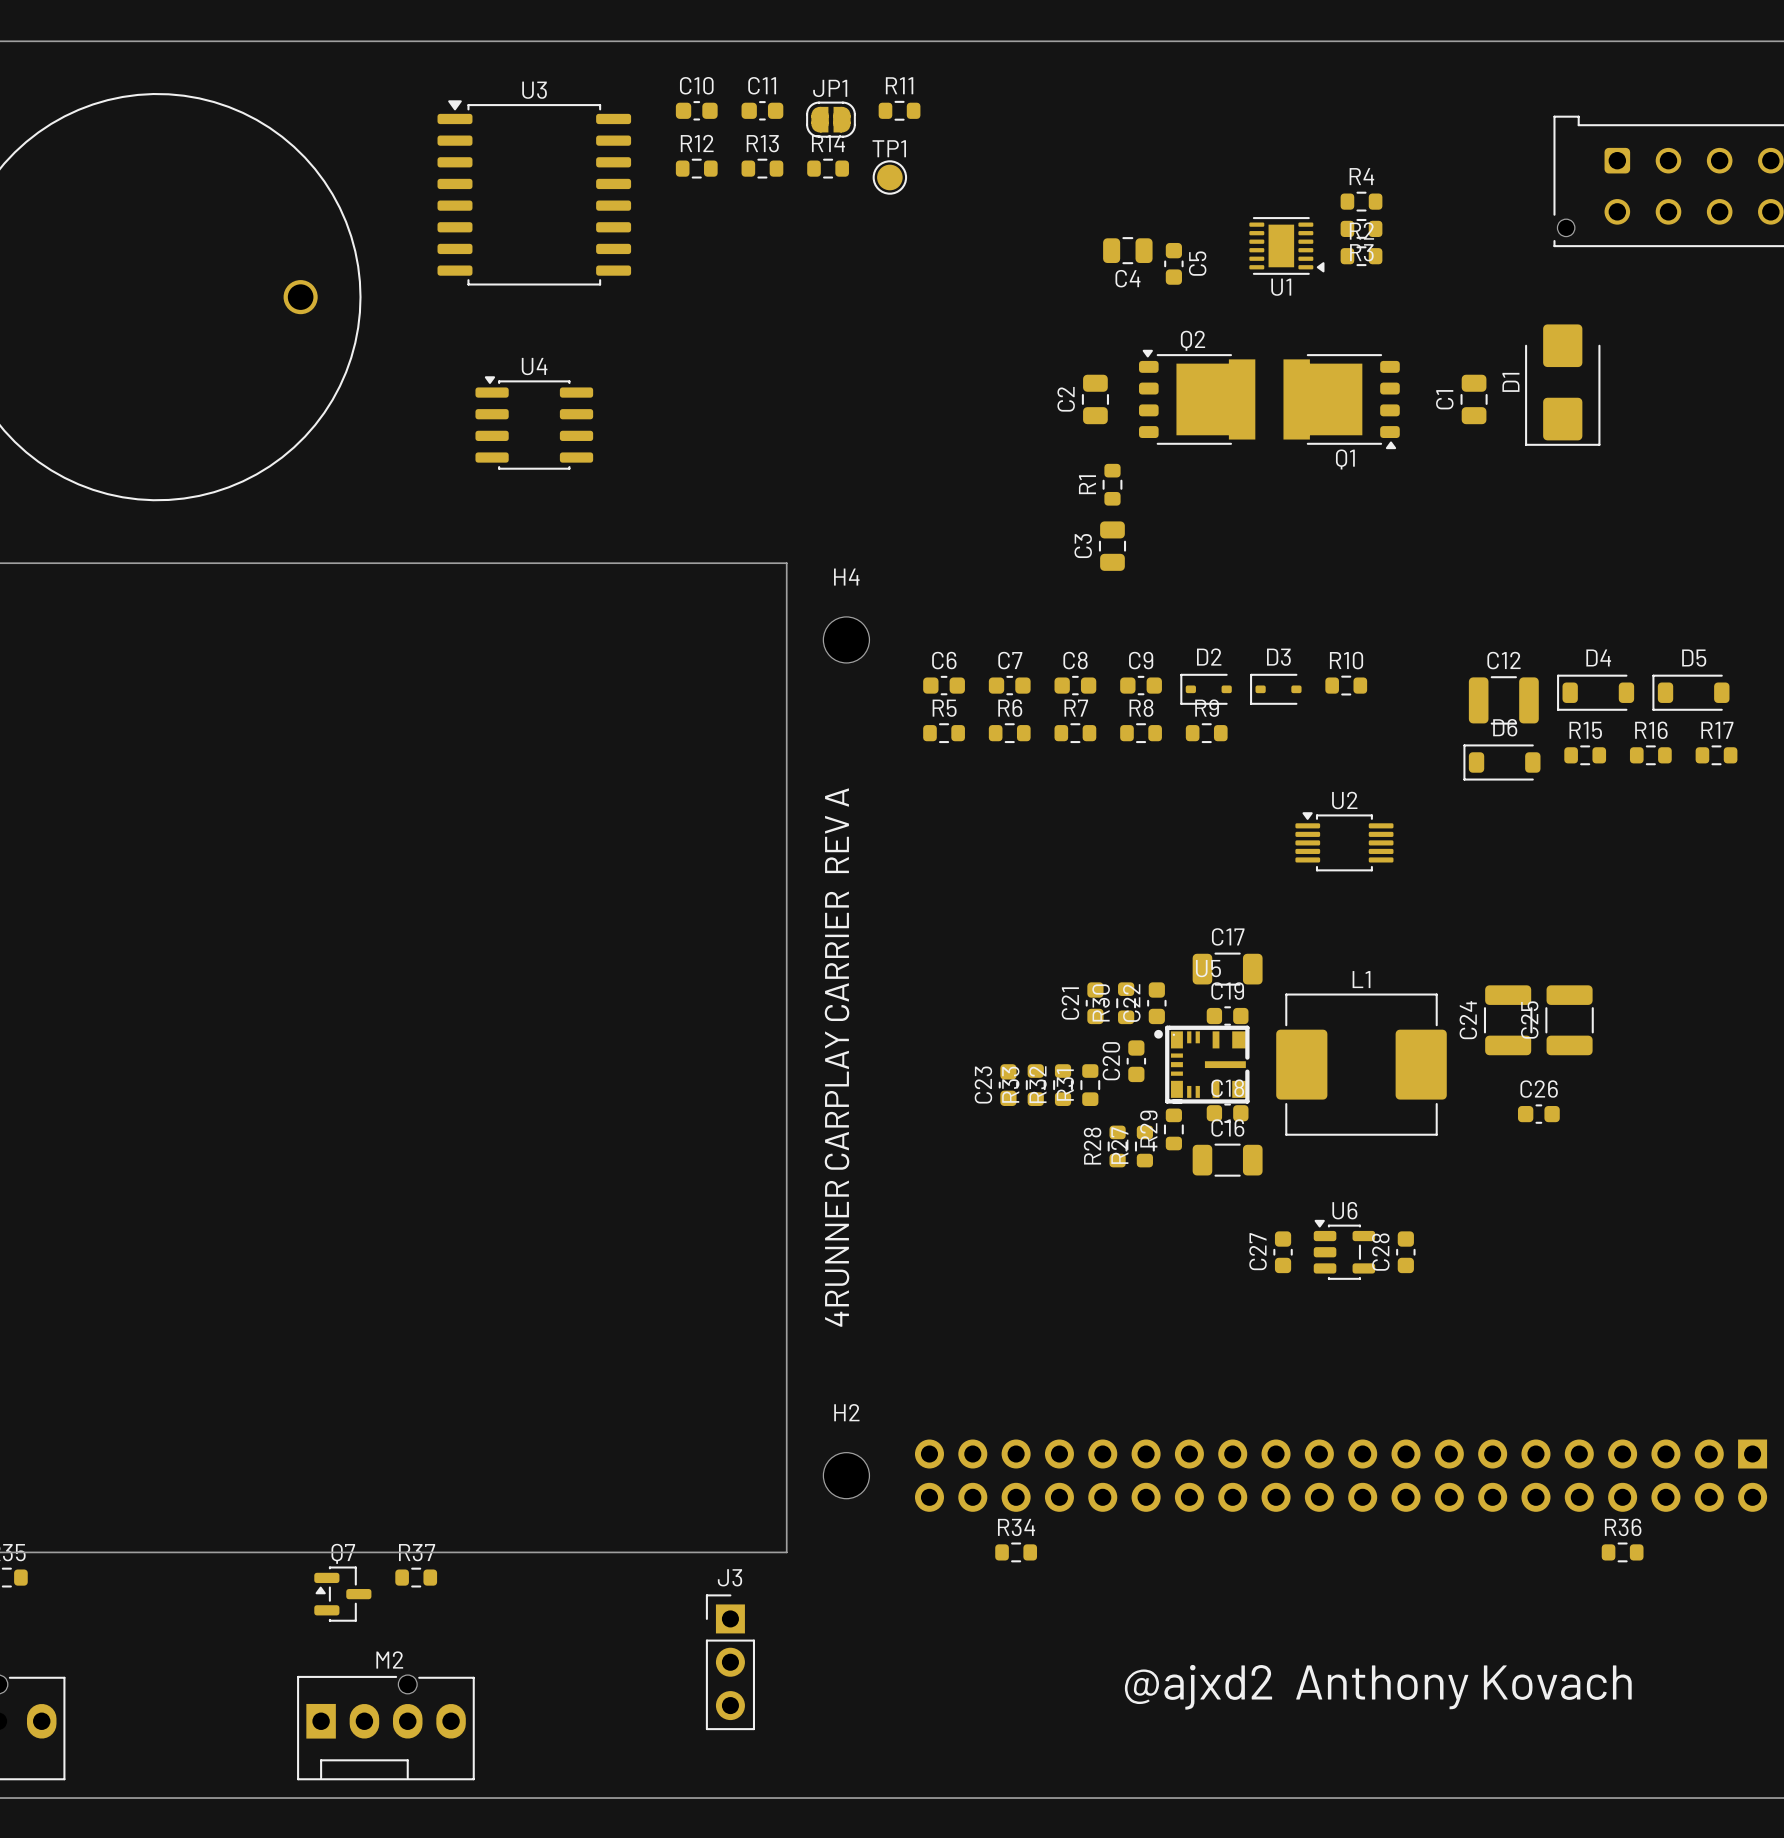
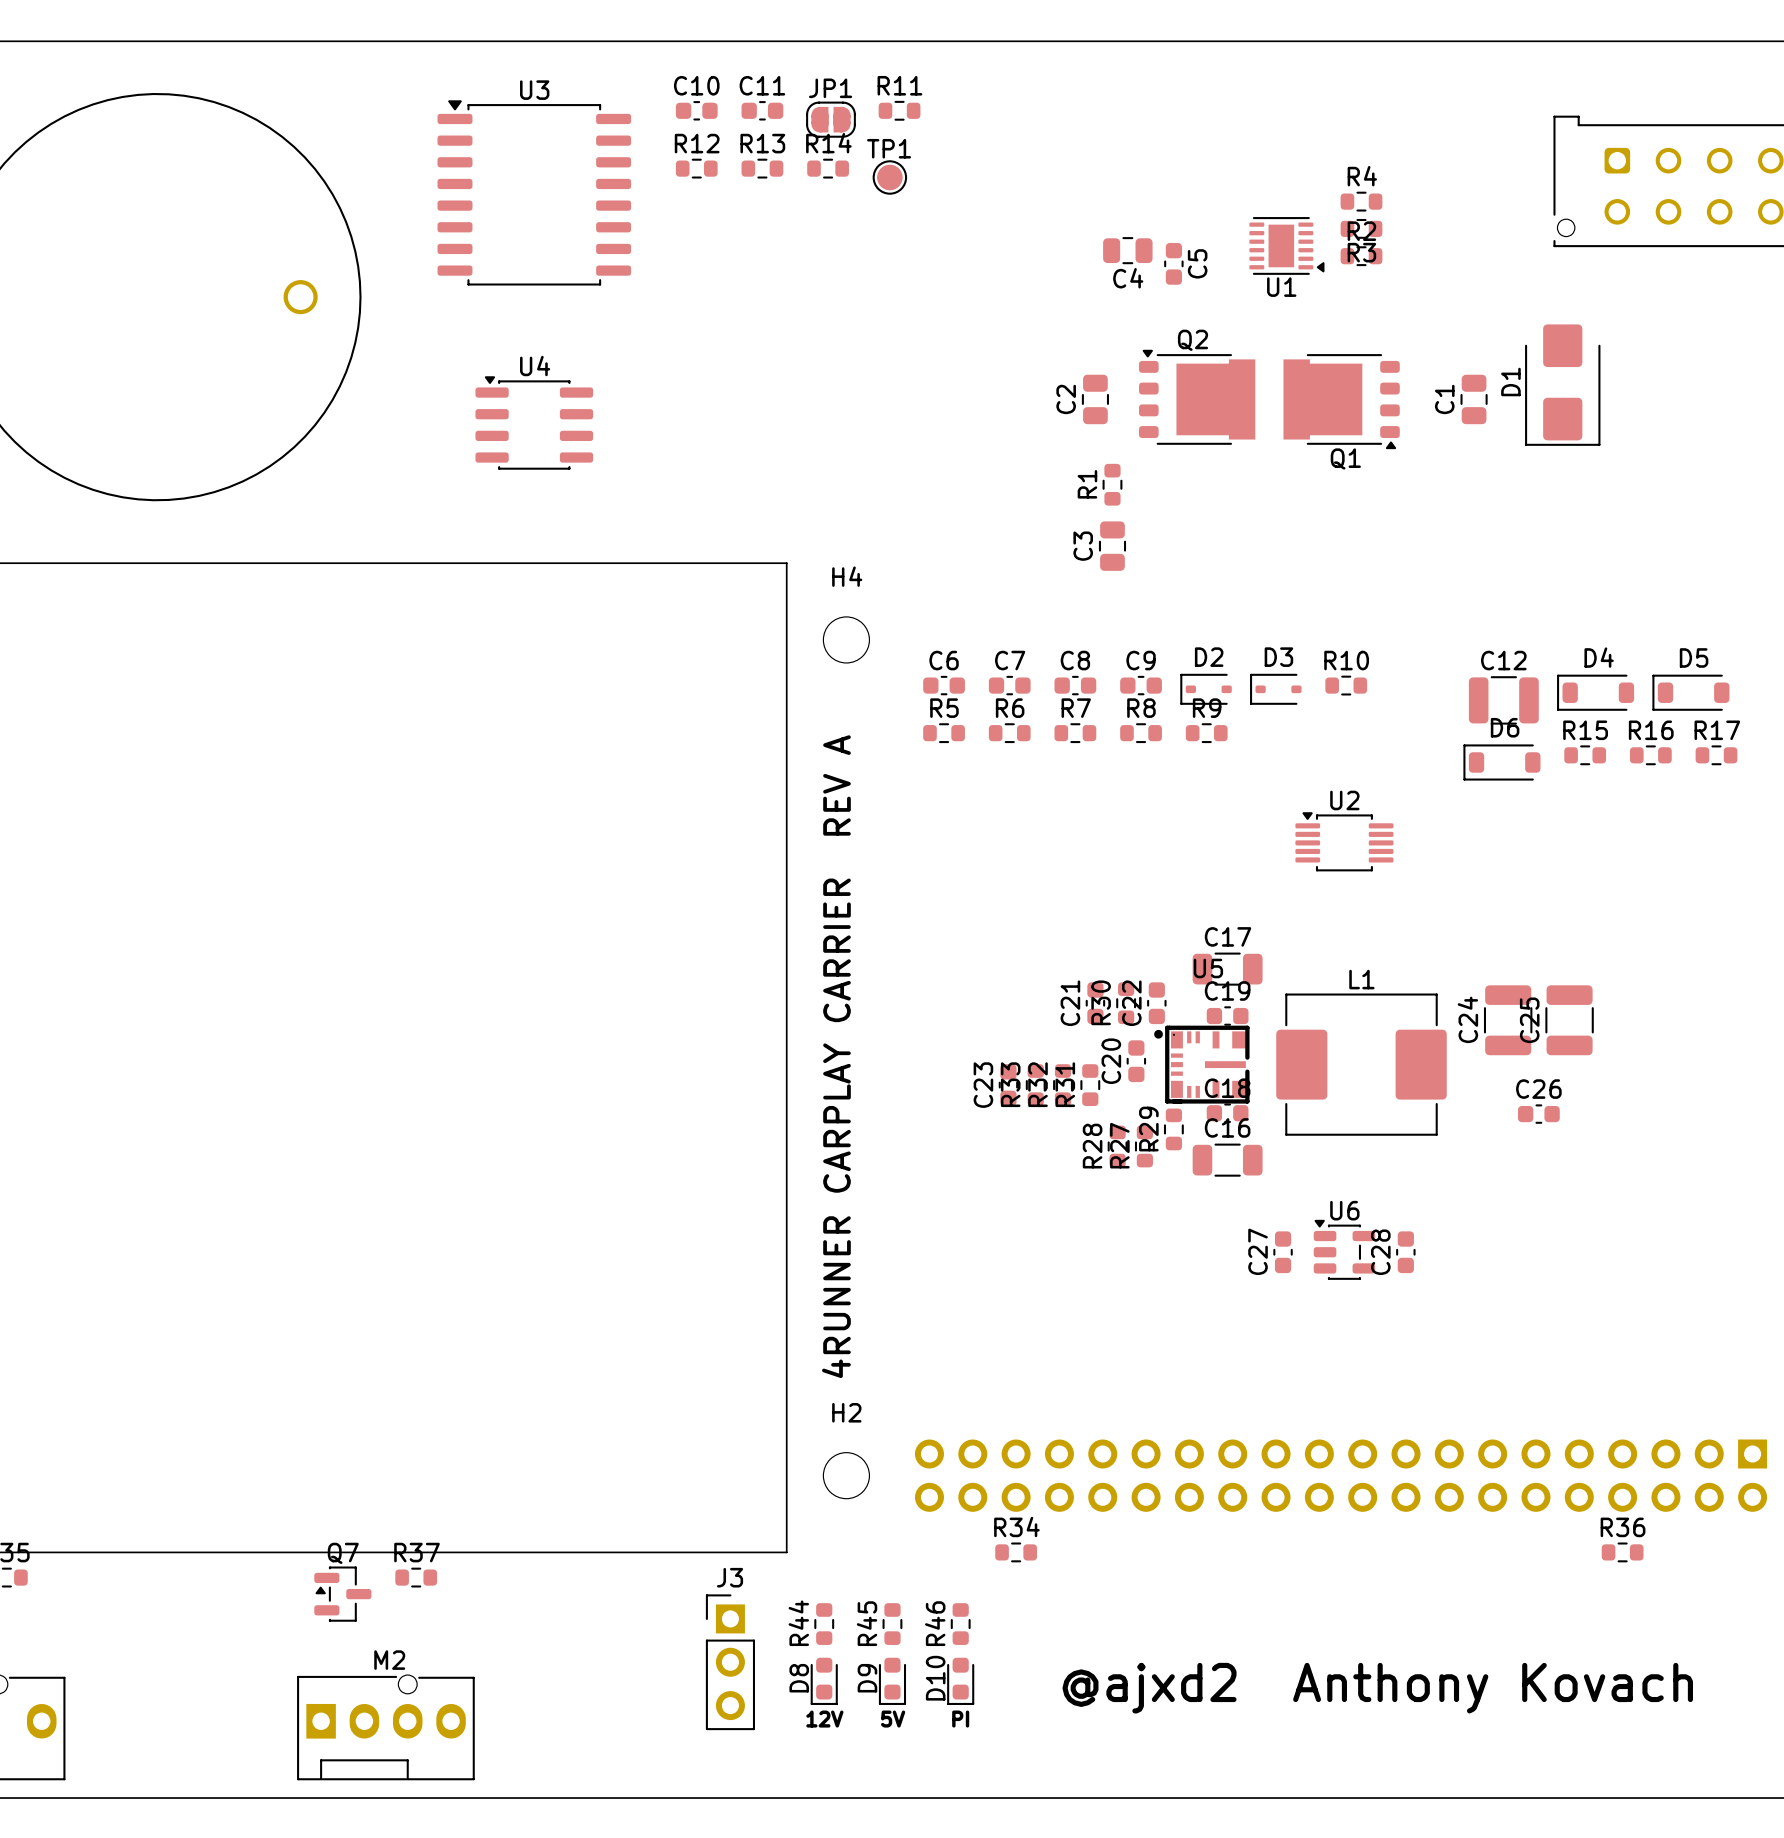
R44: none -> (824, 1624)
R45: none -> (892, 1624)
R46: none -> (960, 1624)
D8: none -> (824, 1681)
D9: none -> (892, 1681)
D10: none -> (960, 1681)
text: none -> 12V (824, 1719)
text: none -> 5V (893, 1719)
text: none -> PI (960, 1719)

